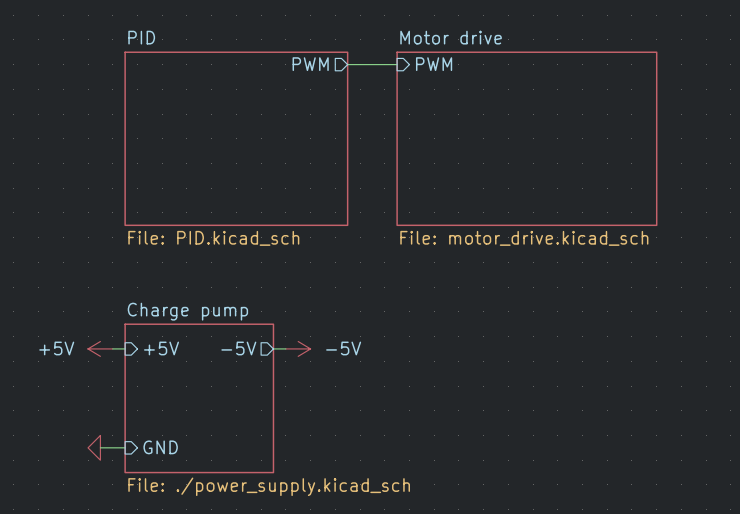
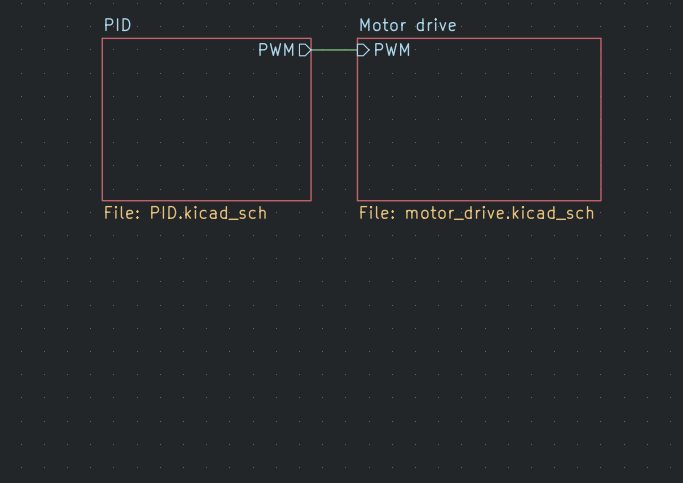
power symbol: +5V (100, 348) -> none
wire: (112, 348) (125, 348) -> none
sheet pin: +5V (161, 348) -> none
sheet pin: -5V (238, 348) -> none
wire: (273, 348) (285, 348) -> none
power symbol: -5V (298, 348) -> none
sheet Charge pump: File: ./power_supply.kicad_sch (199, 398) -> none
power symbol: (94, 447) -> none
wire: (100, 447) (125, 447) -> none
sheet pin: GND (160, 447) -> none

